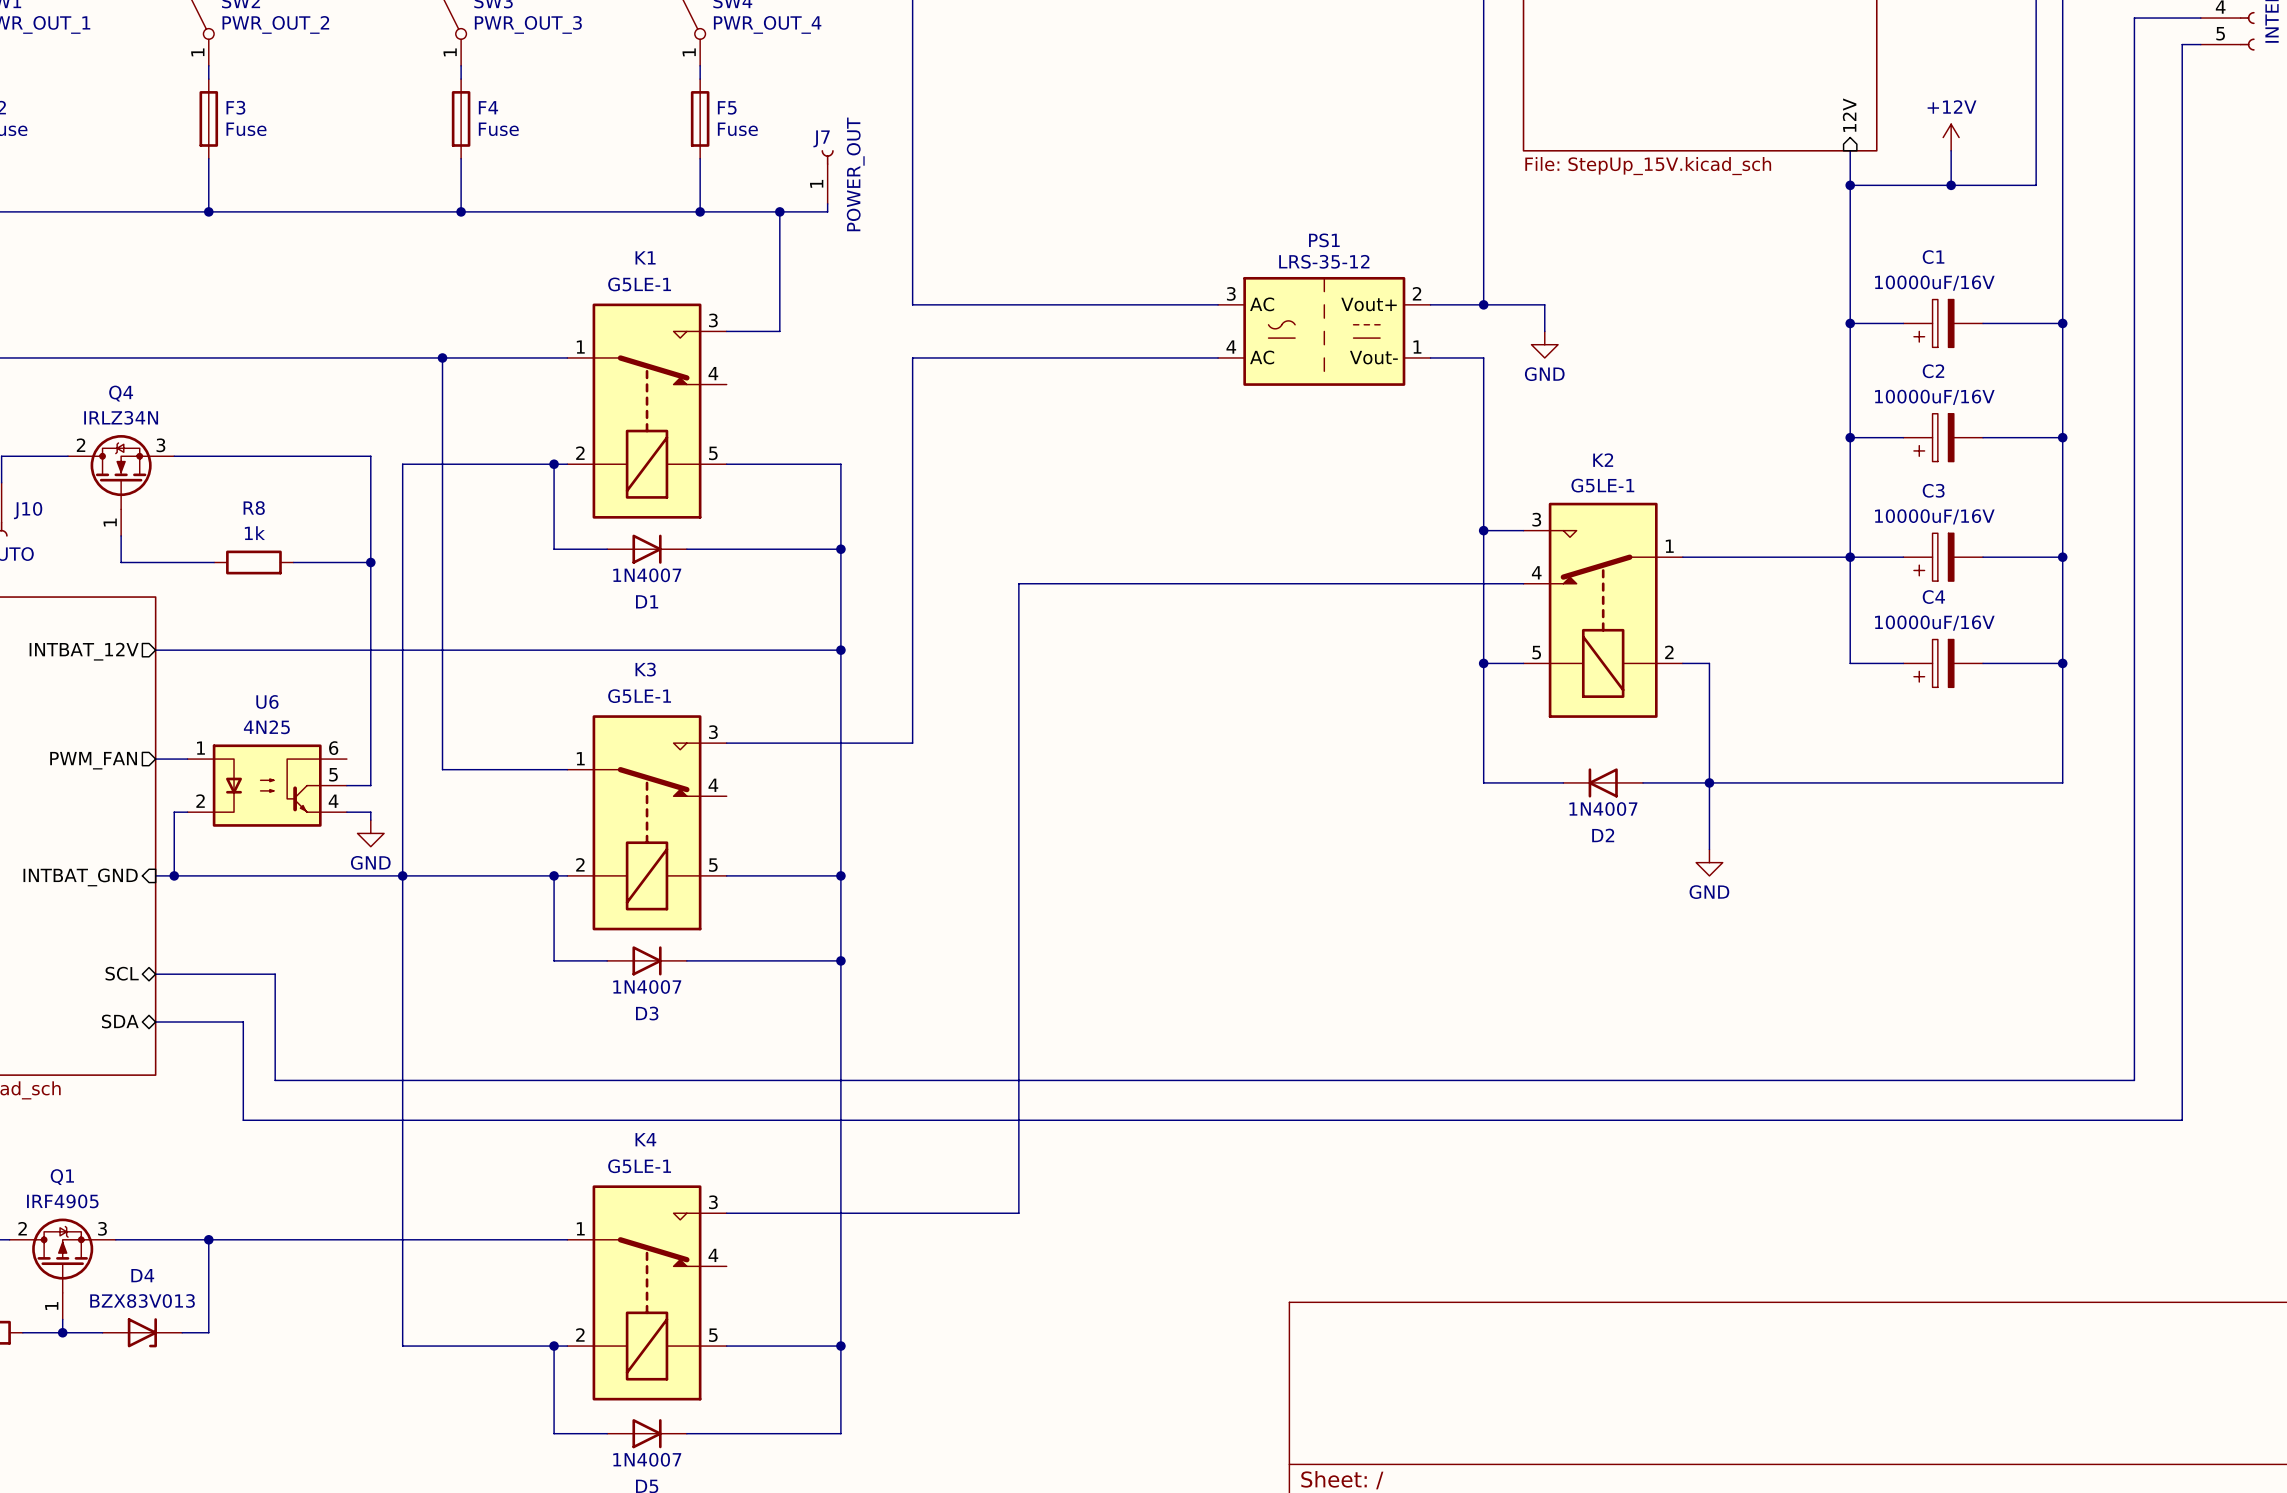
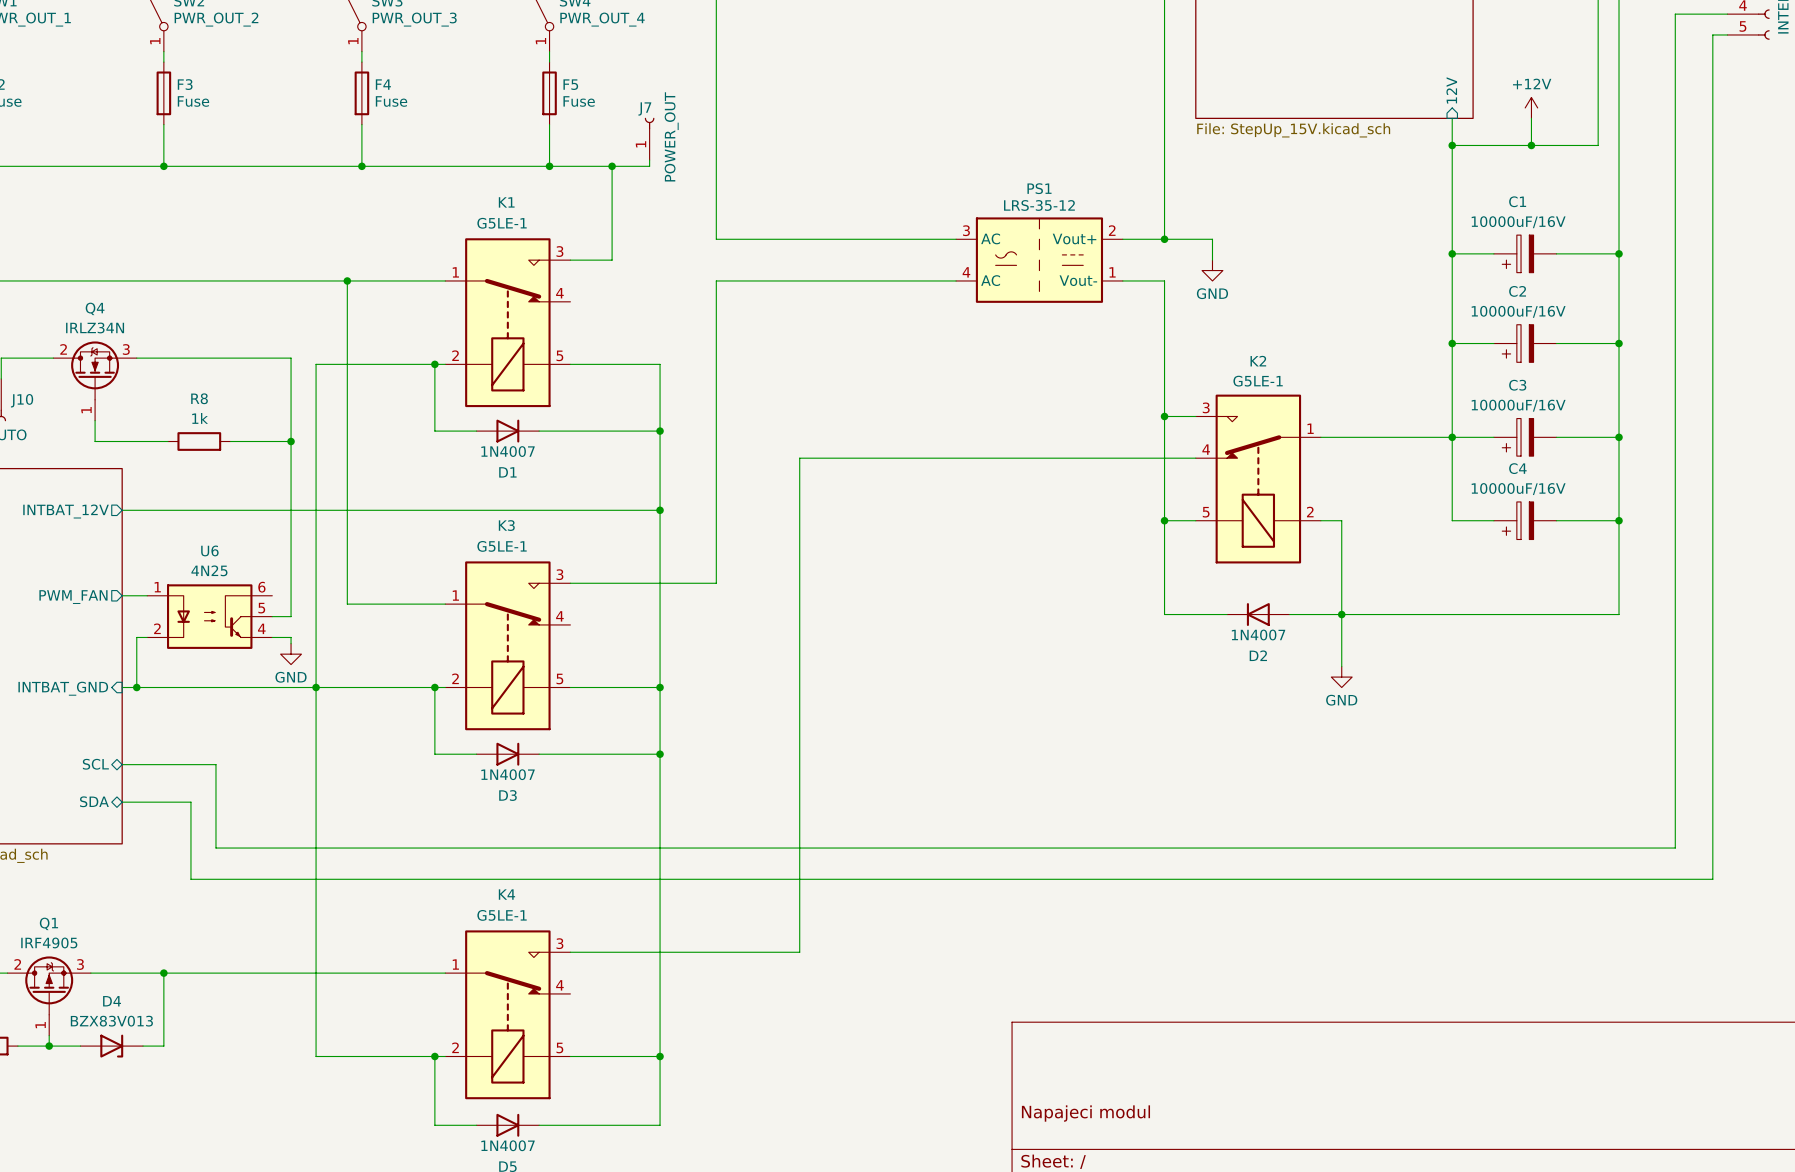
title block: none -> Napajeci modul (1085, 1113)

